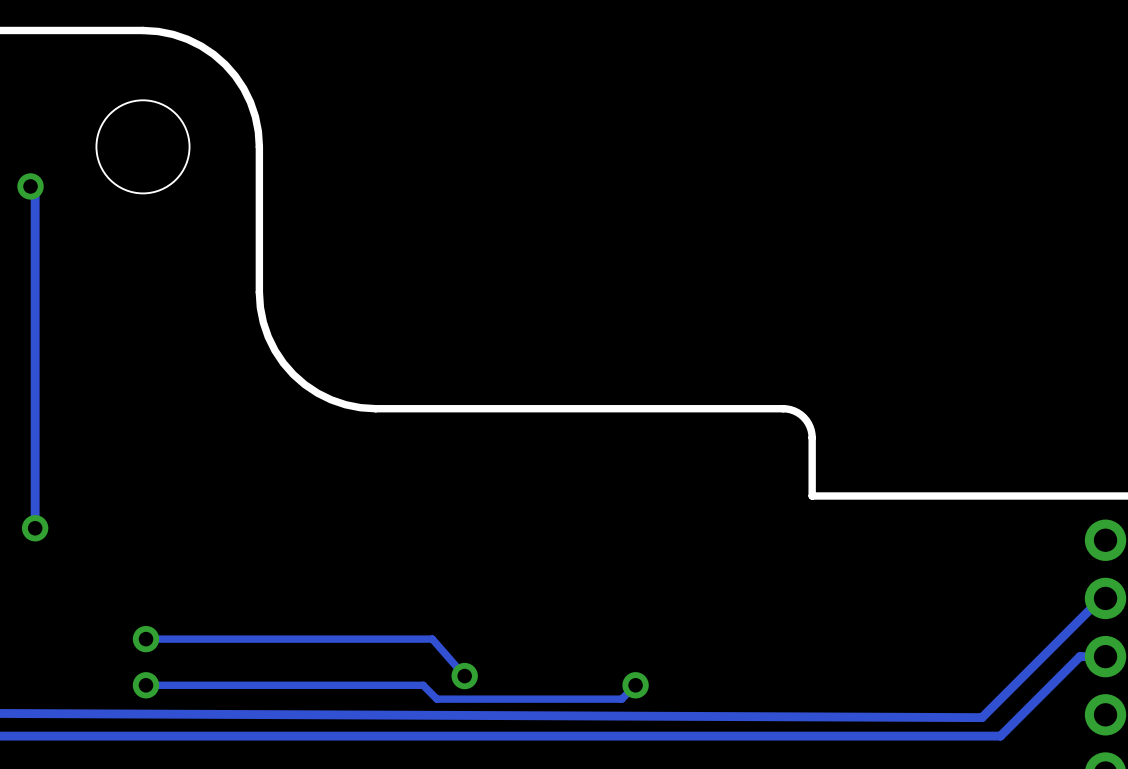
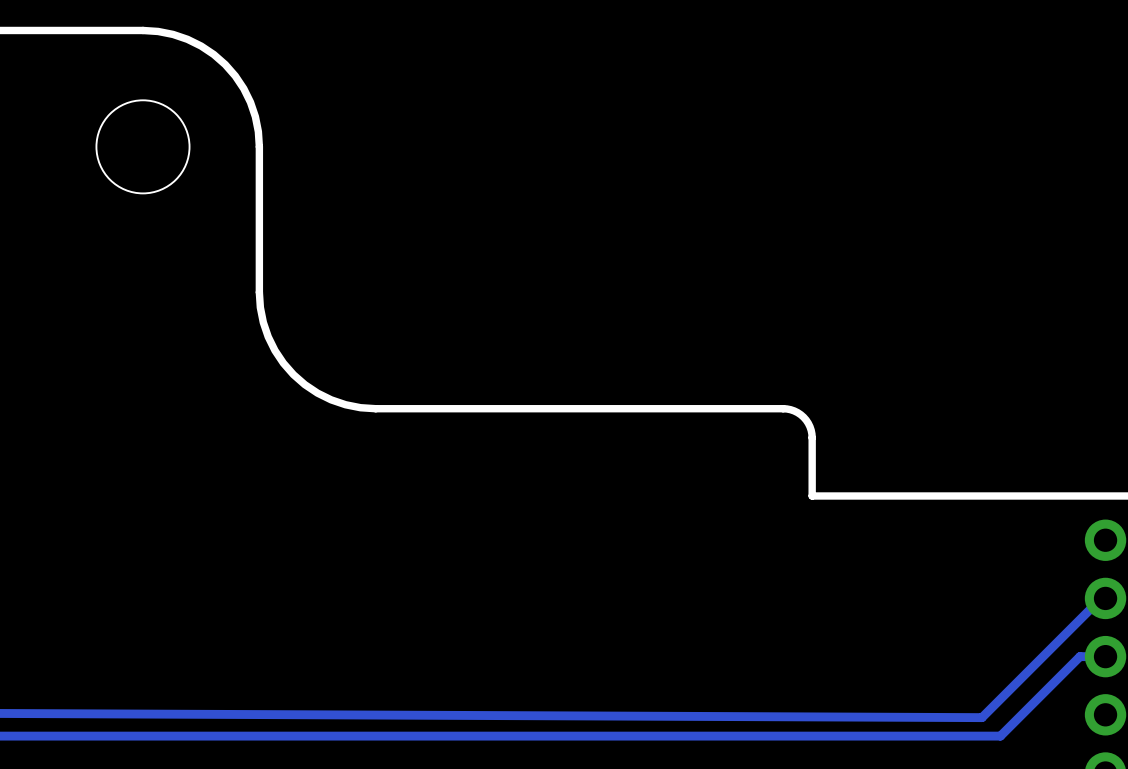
track: (30, 186) (35, 191) (35, 528) -> none
via: (30, 186) -> none
via: (35, 528) -> none
track: (146, 639) (432, 639) (464, 676) -> none
via: (146, 639) -> none
via: (464, 676) -> none
via: (146, 685) -> none
track: (635, 685) (621, 699) (436, 699) (423, 685) (146, 685) -> none
via: (635, 685) -> none

